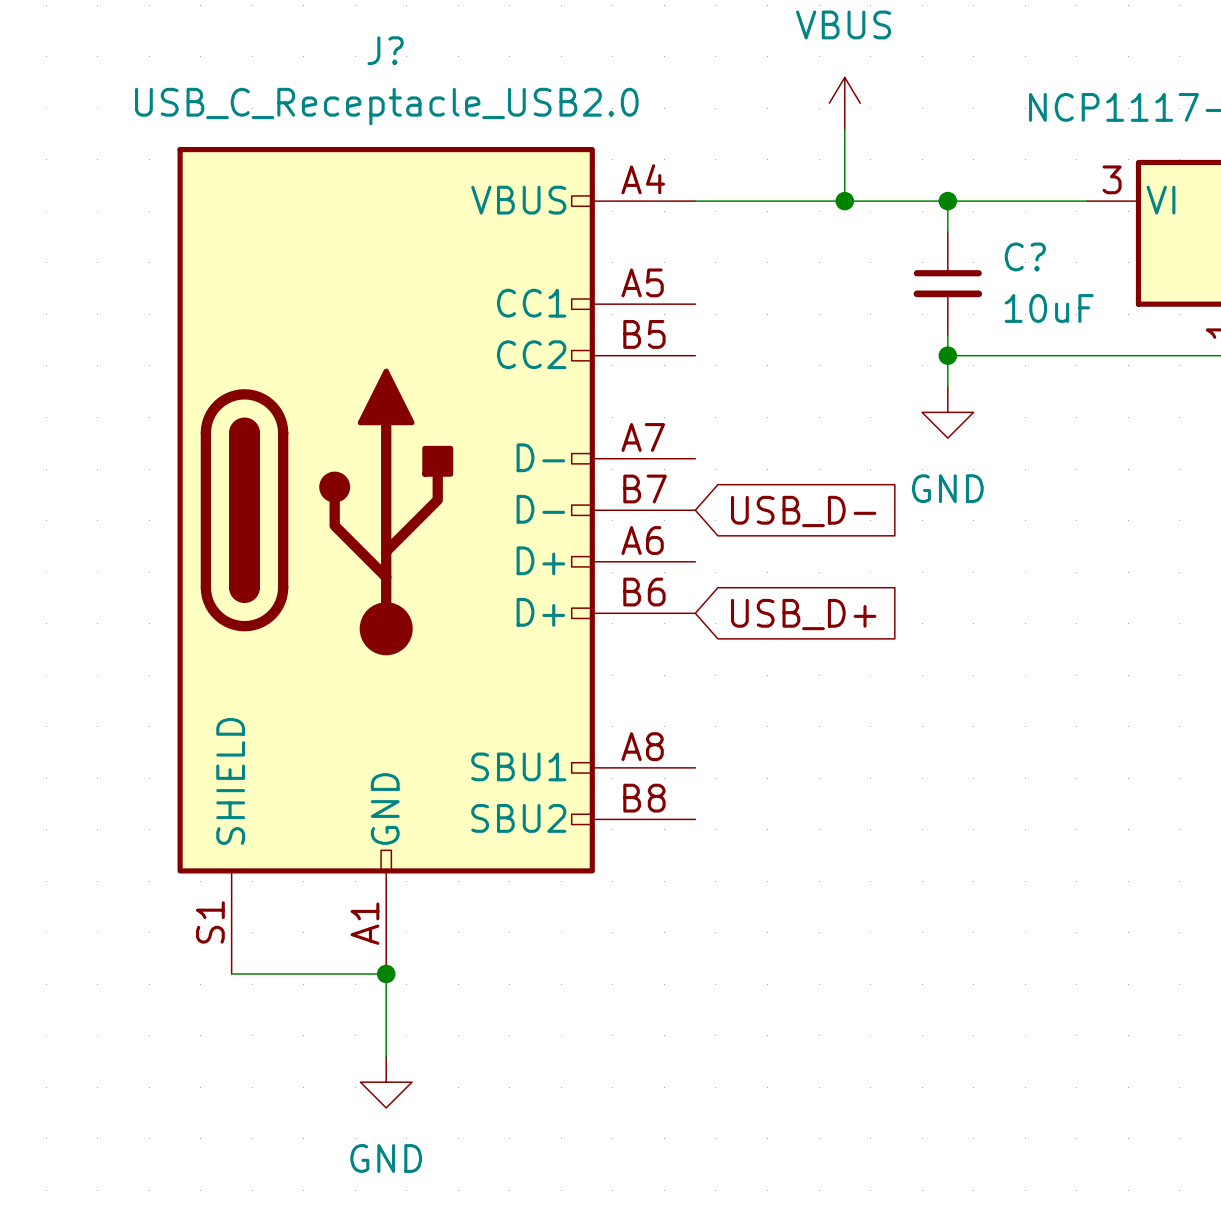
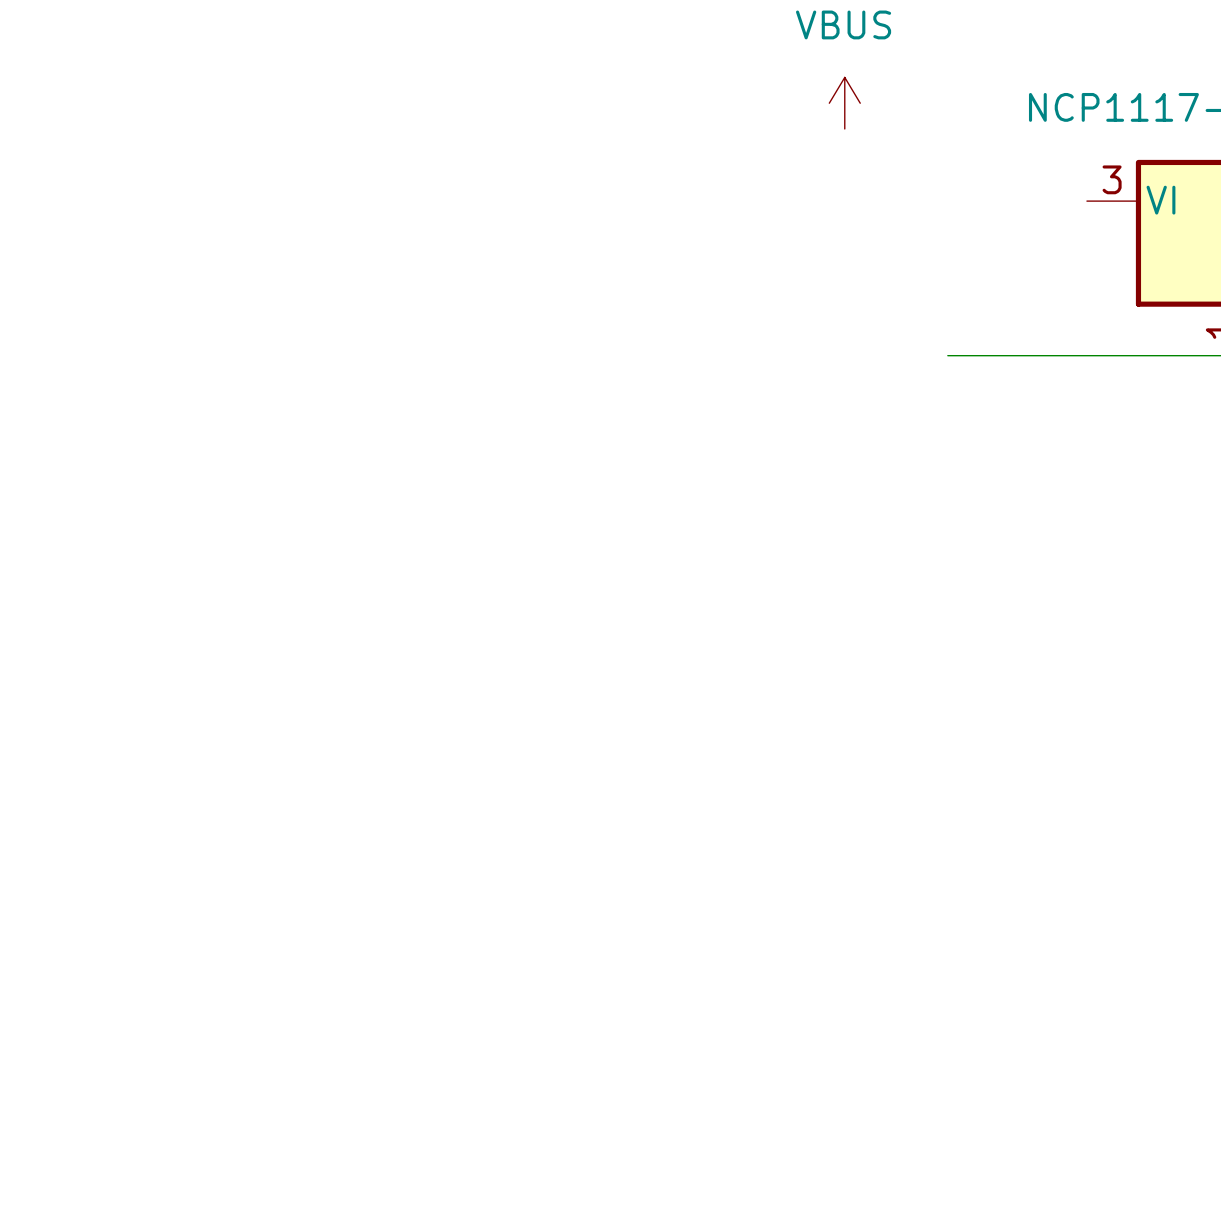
wire: (844, 128) (844, 201) -> none
wire: (695, 201) (1086, 201) -> none
junction: (844, 201) -> none
wire: (947, 201) (947, 232) -> none
junction: (947, 201) -> none
C?: 10uF (947, 283) -> none
wire: (947, 335) (947, 386) -> none
junction: (947, 355) -> none
power symbol: GND (947, 412) -> none
global label: USB_D- (803, 511) -> none
J?: USB_C_Receptacle_USB2.0 (436, 560) -> none
global label: USB_D+ (803, 614) -> none
wire: (231, 973) (386, 973) (386, 1056) -> none
junction: (386, 973) -> none
power symbol: GND (386, 1082) -> none

